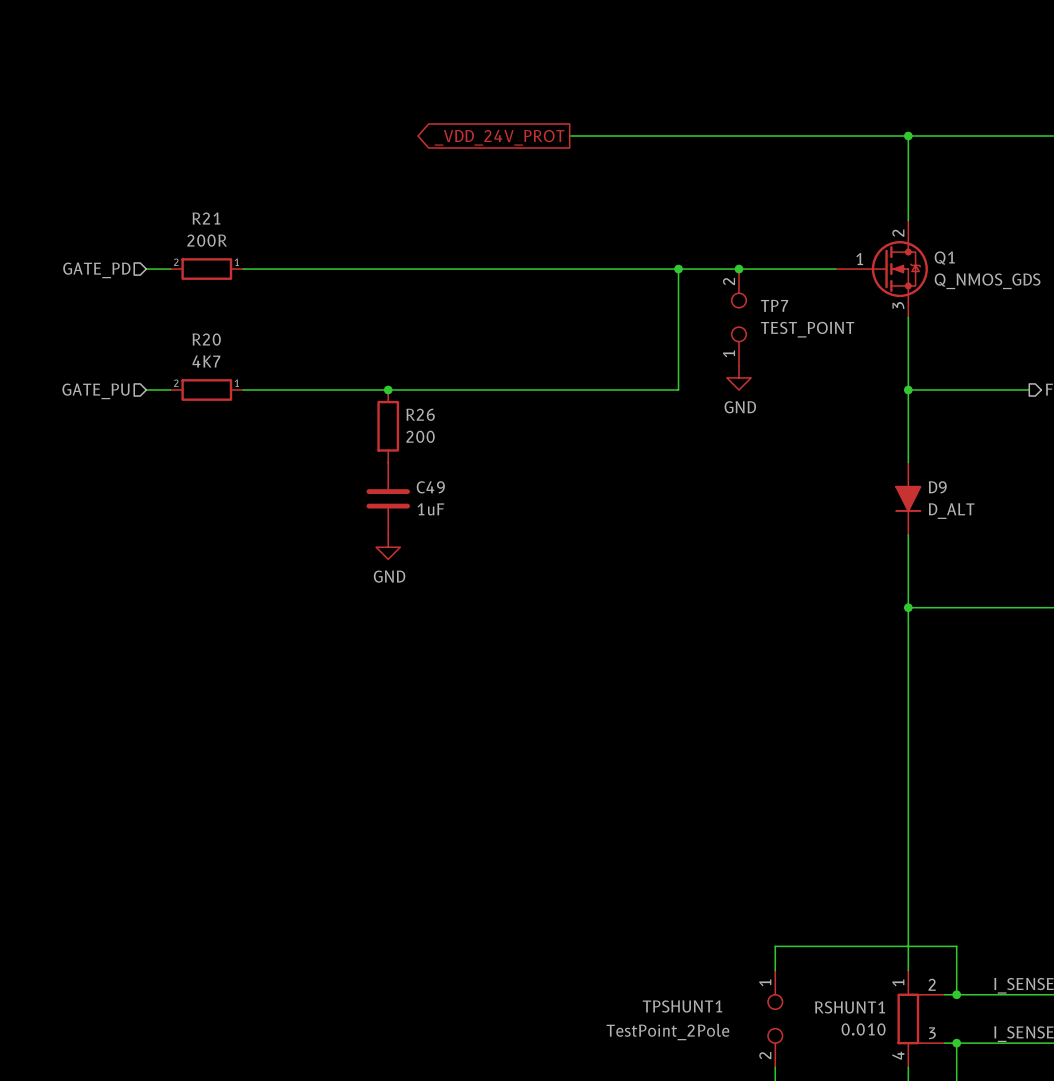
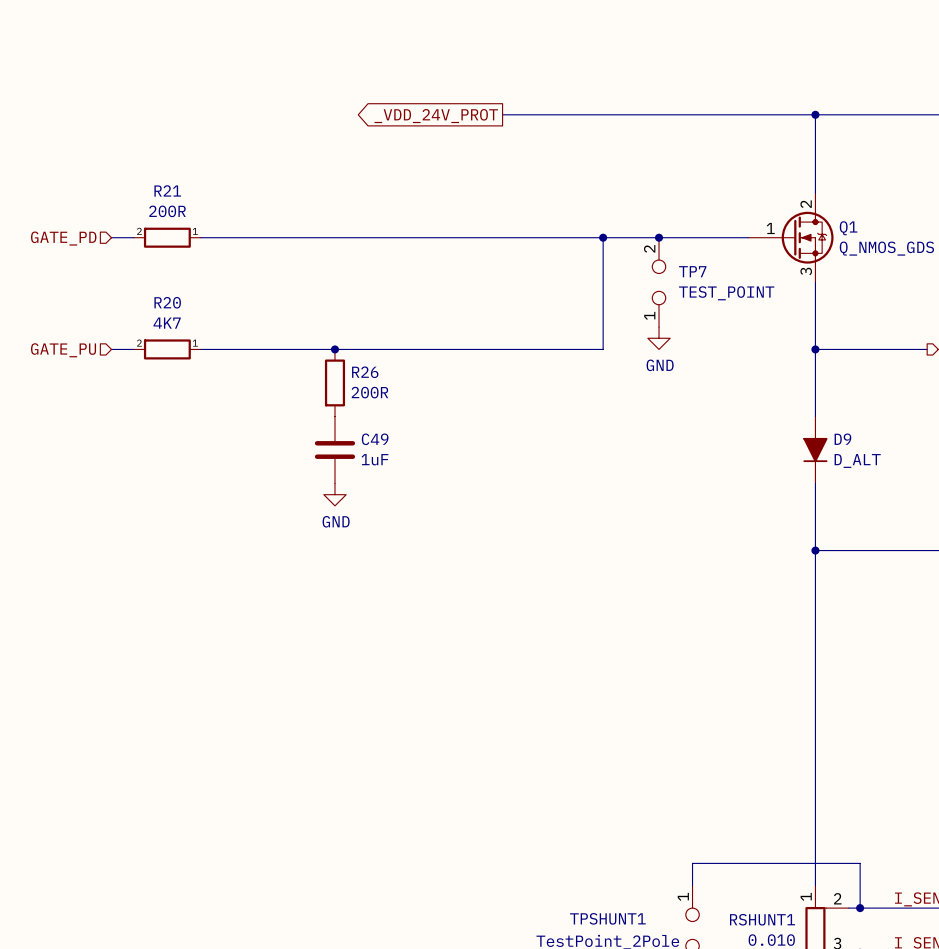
R26 value: 200 (420, 436) -> 200R (369, 392)

